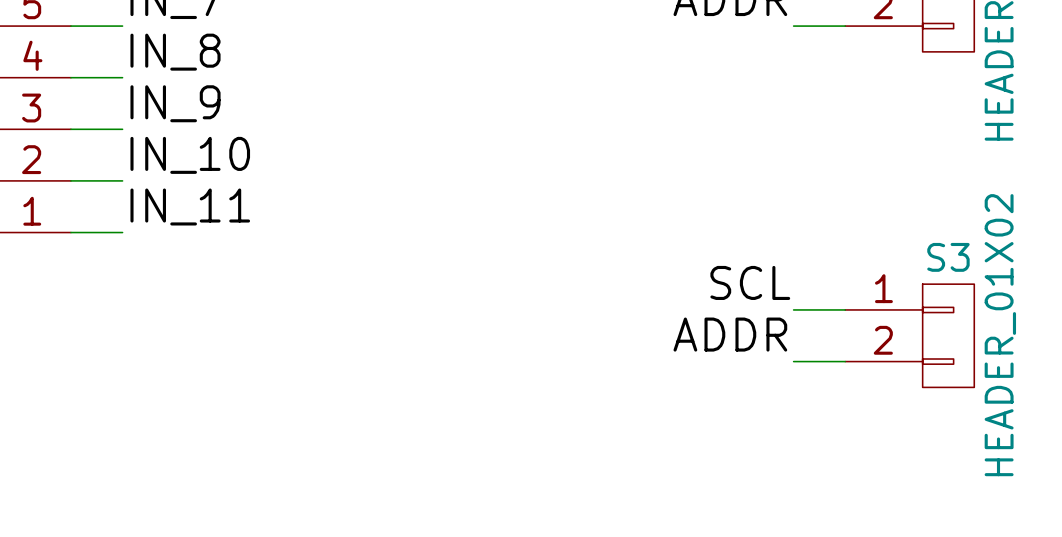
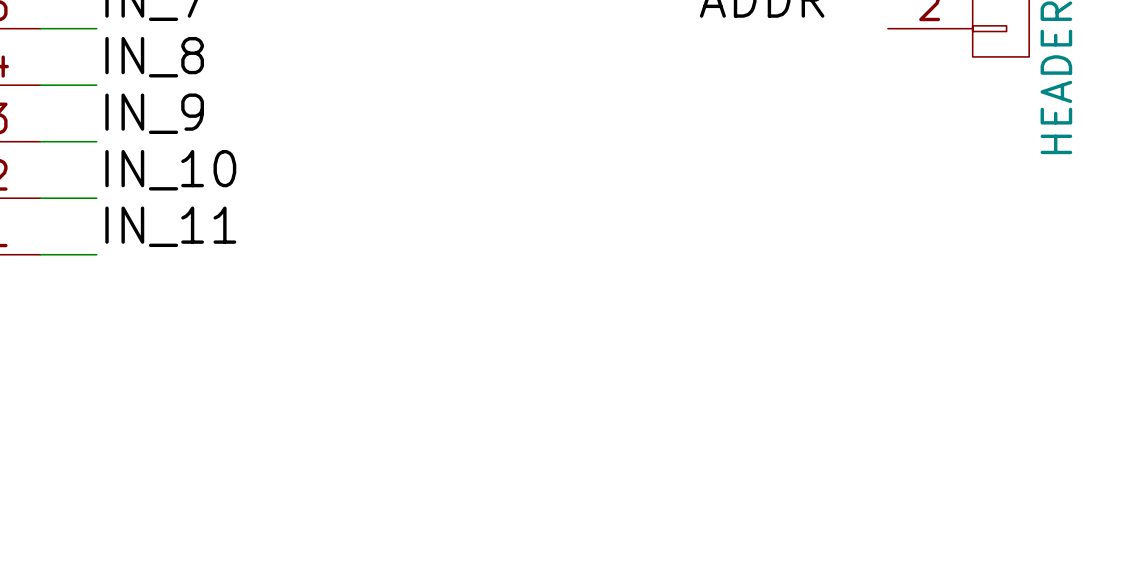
wire: (793, 26) (845, 26) -> none
label: SCL (750, 282) -> none
wire: (793, 309) (845, 309) -> none
label: ADDR (730, 334) -> none
S3: HEADER_01X02 (909, 335) -> none
wire: (793, 361) (845, 361) -> none

